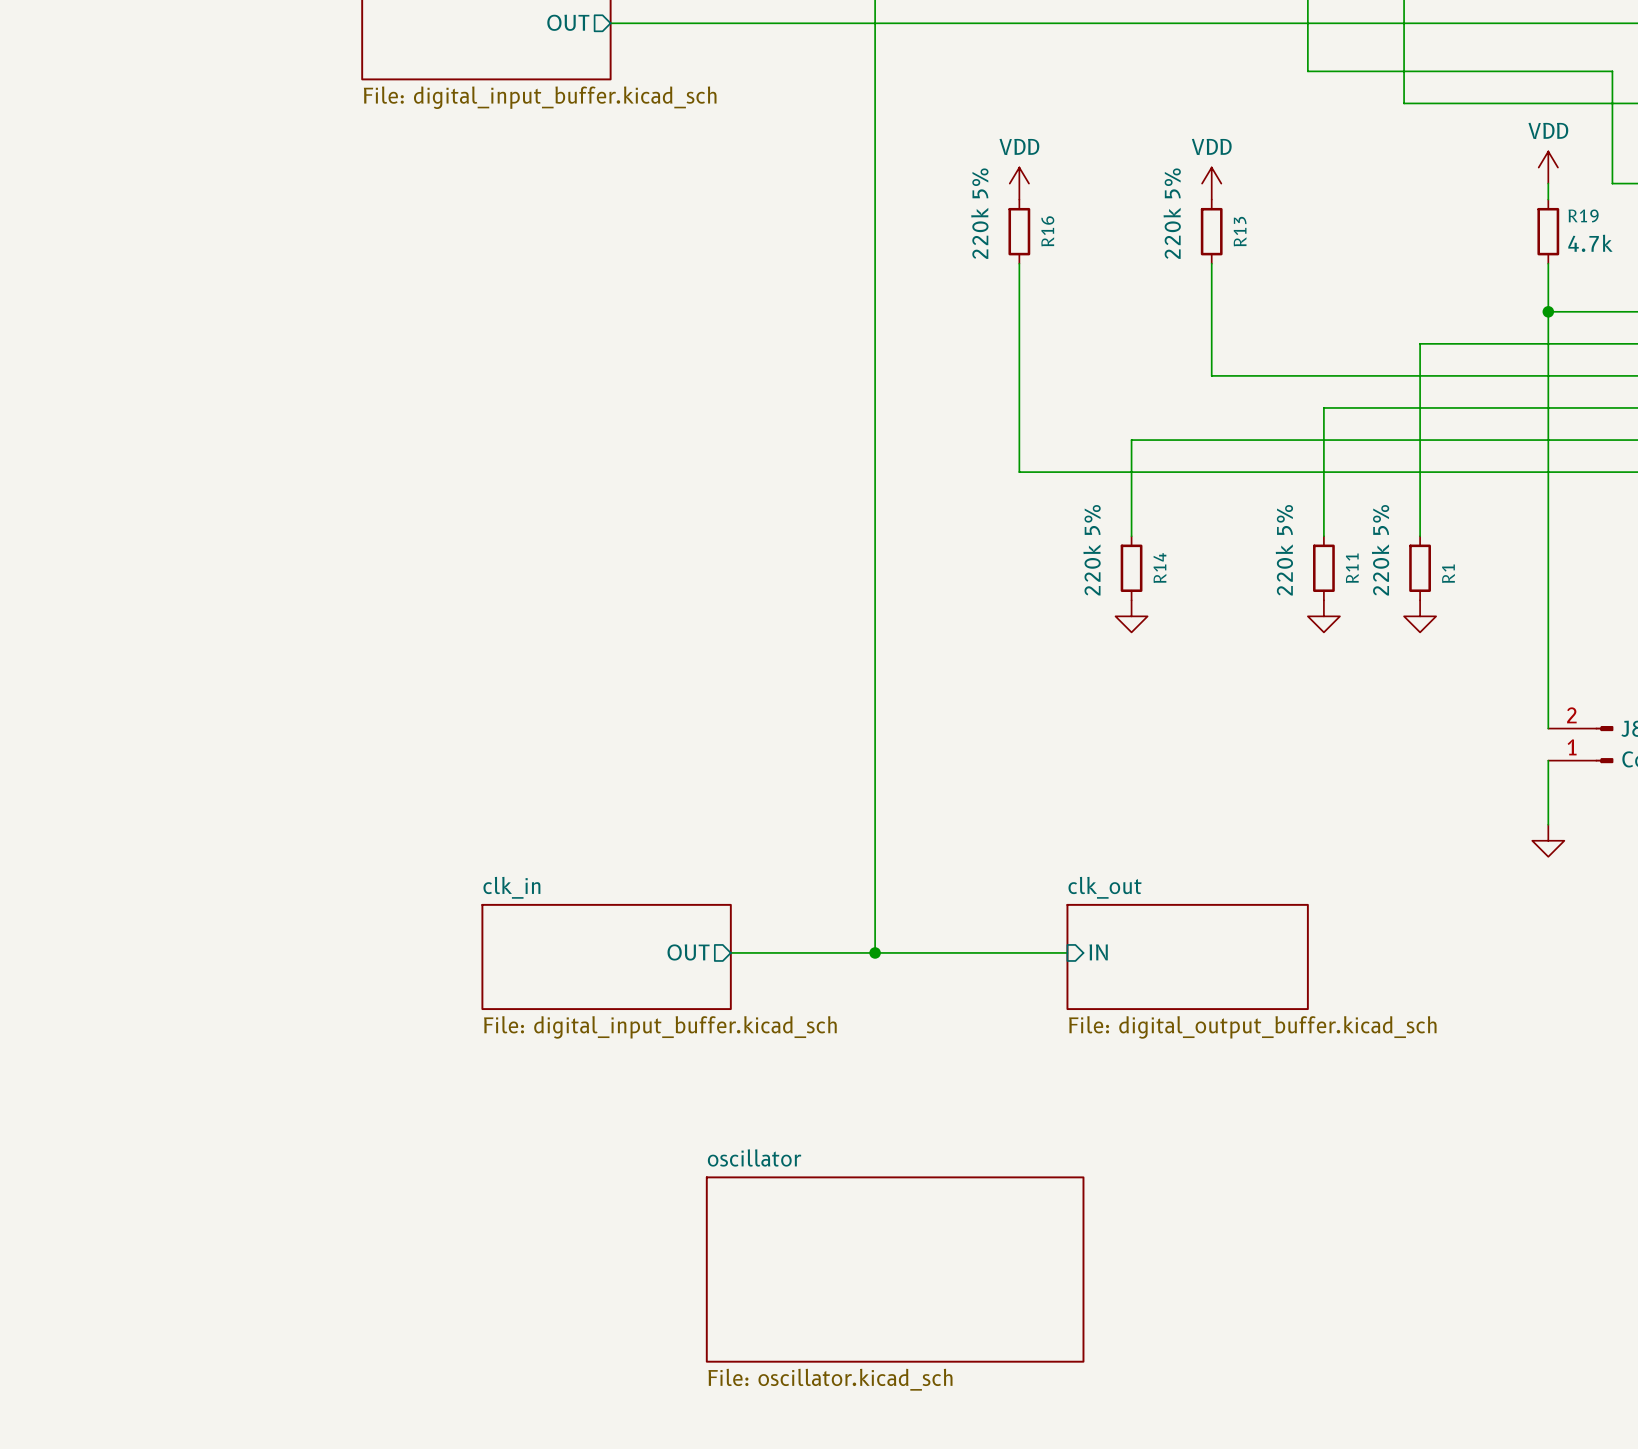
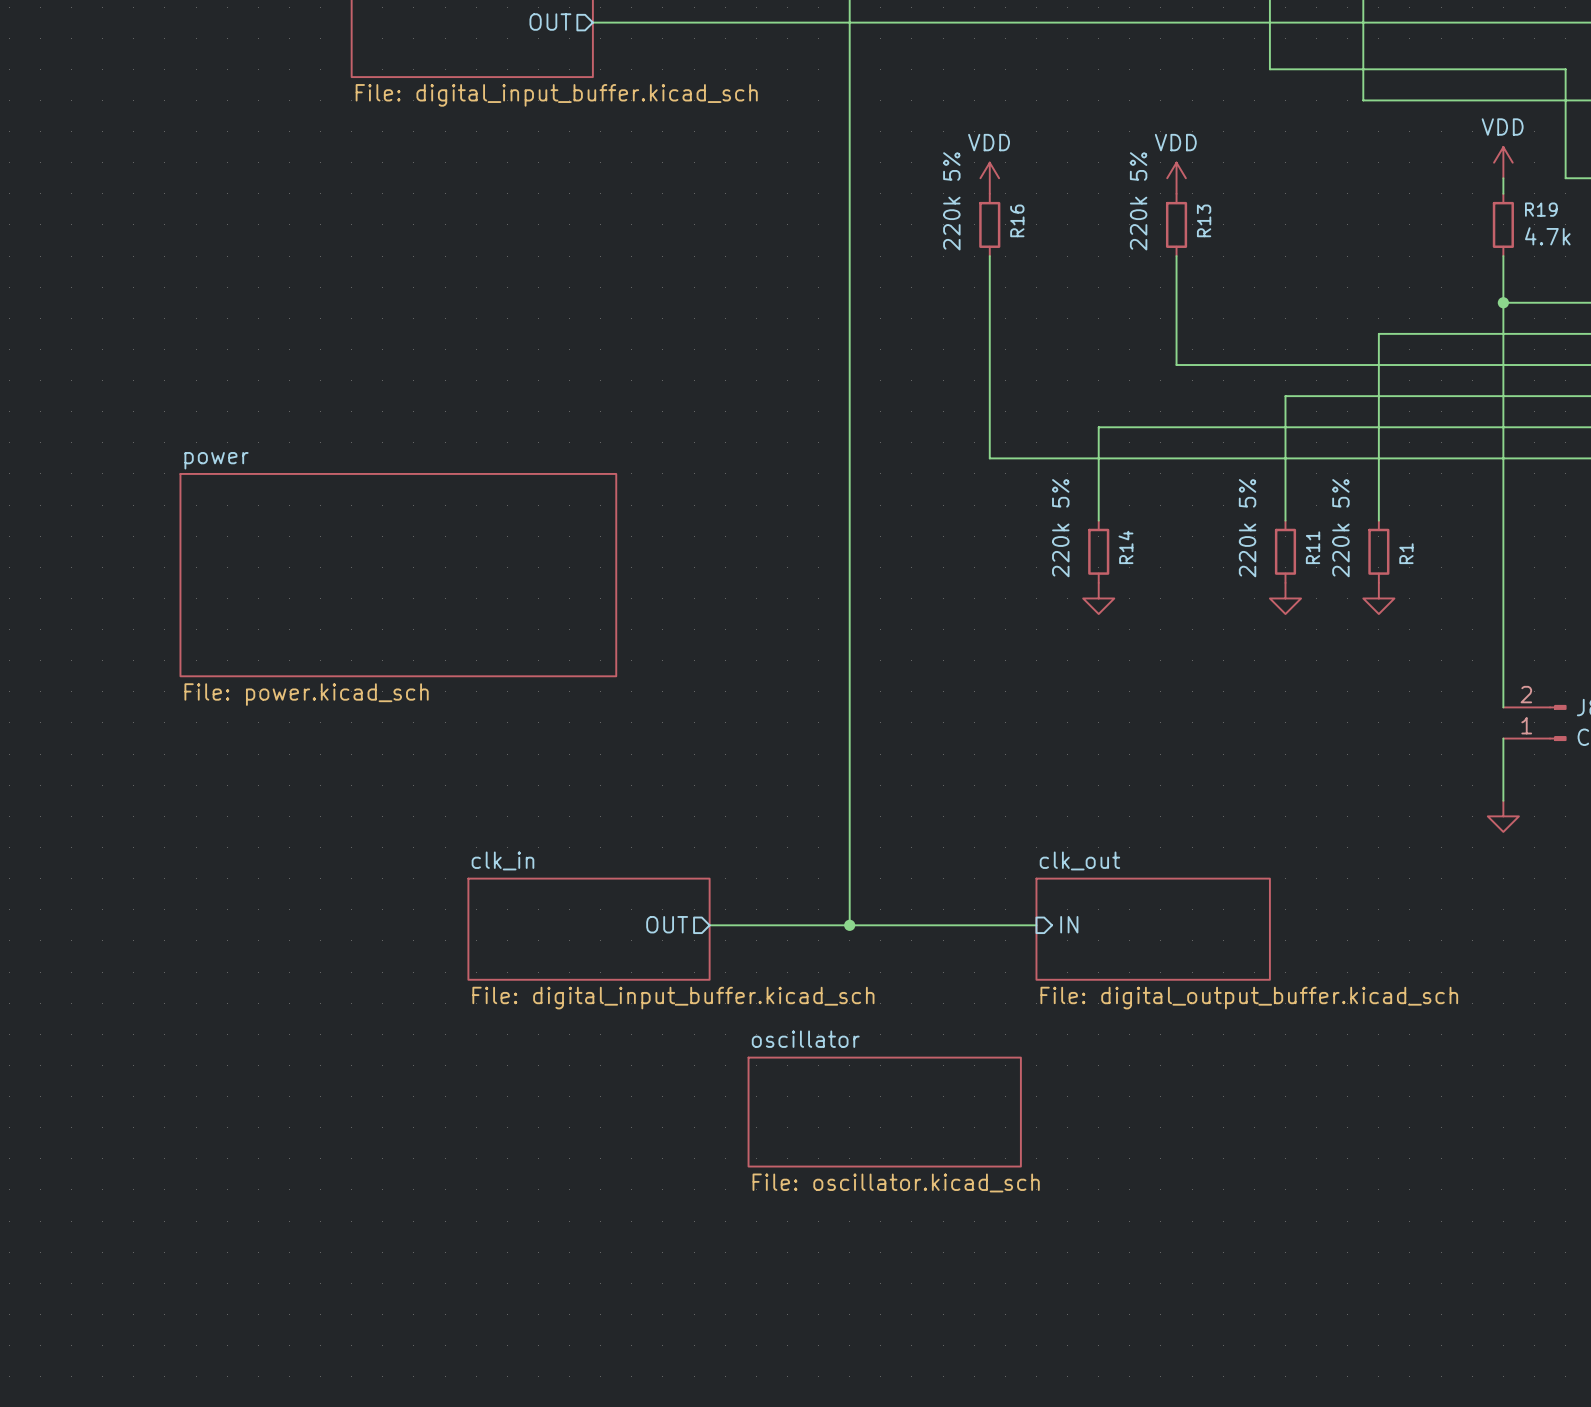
sheet power: none -> File: power.kicad_sch (398, 575)
sheet oscillator: none -> File: oscillator.kicad_sch (884, 1112)
sheet oscillator: File: oscillator.kicad_sch (895, 1269) -> none

